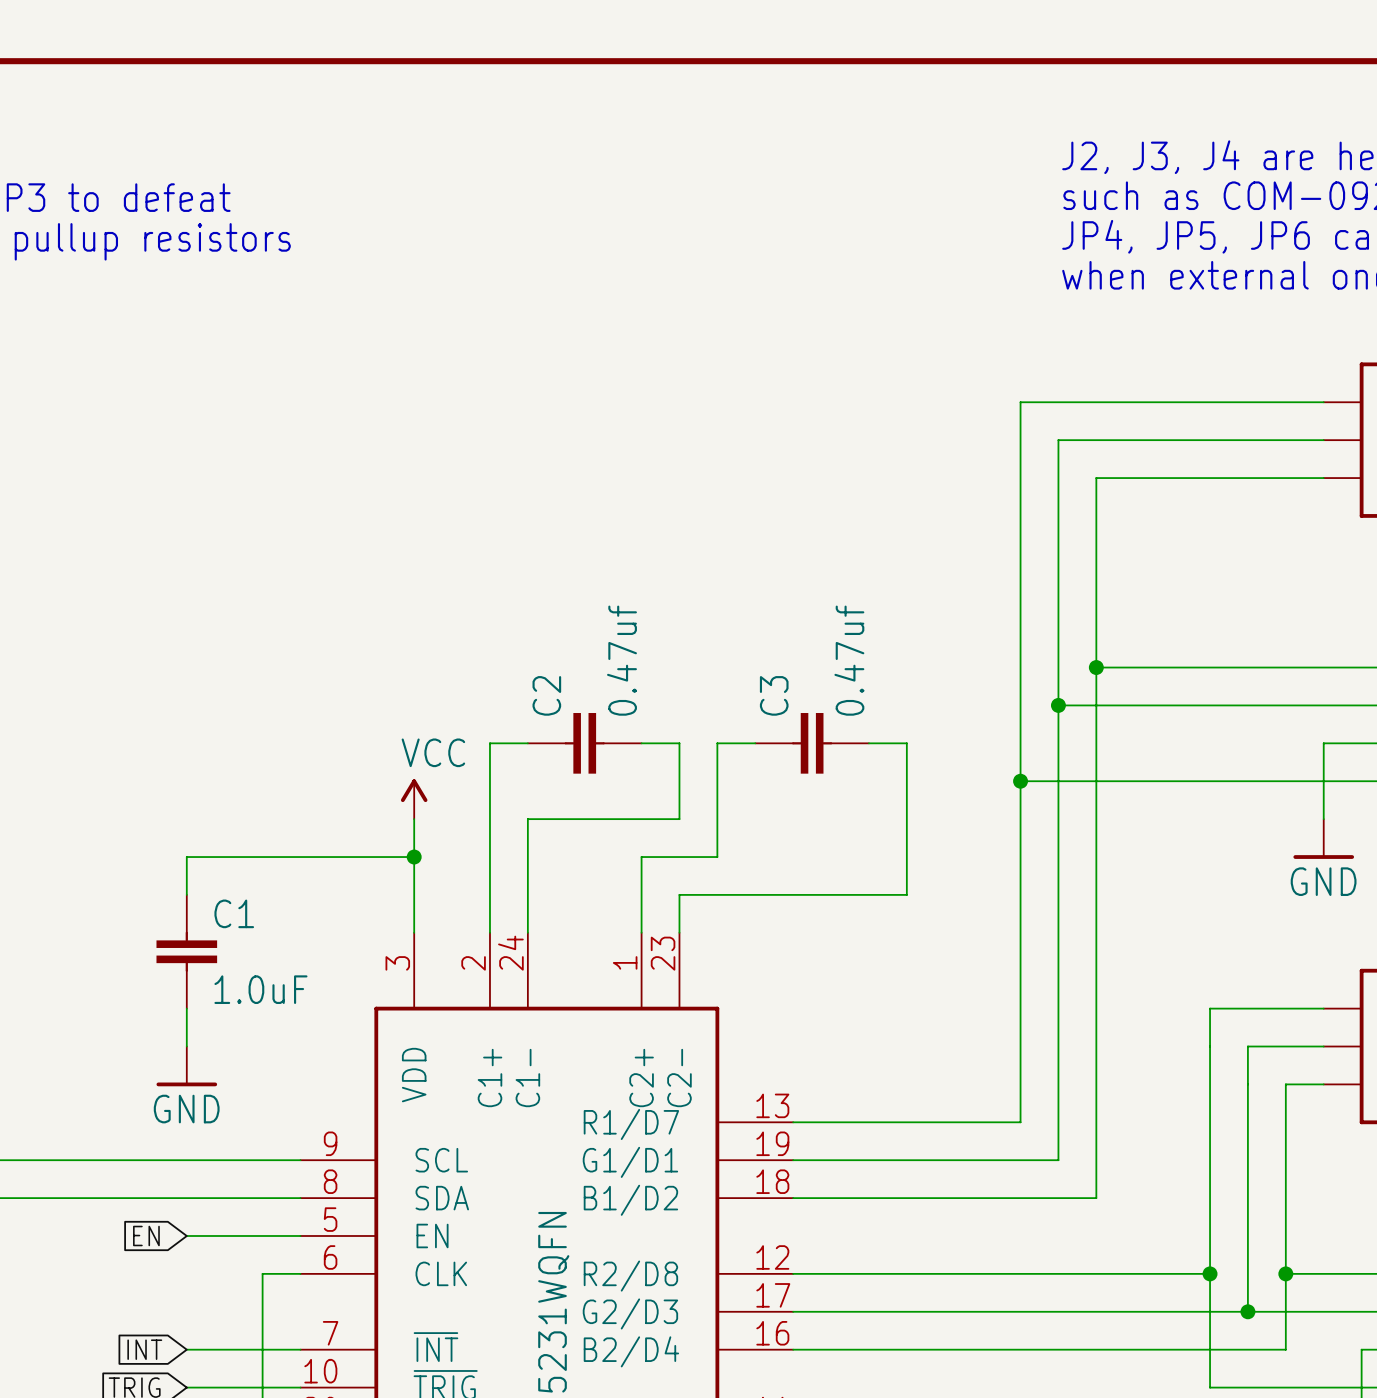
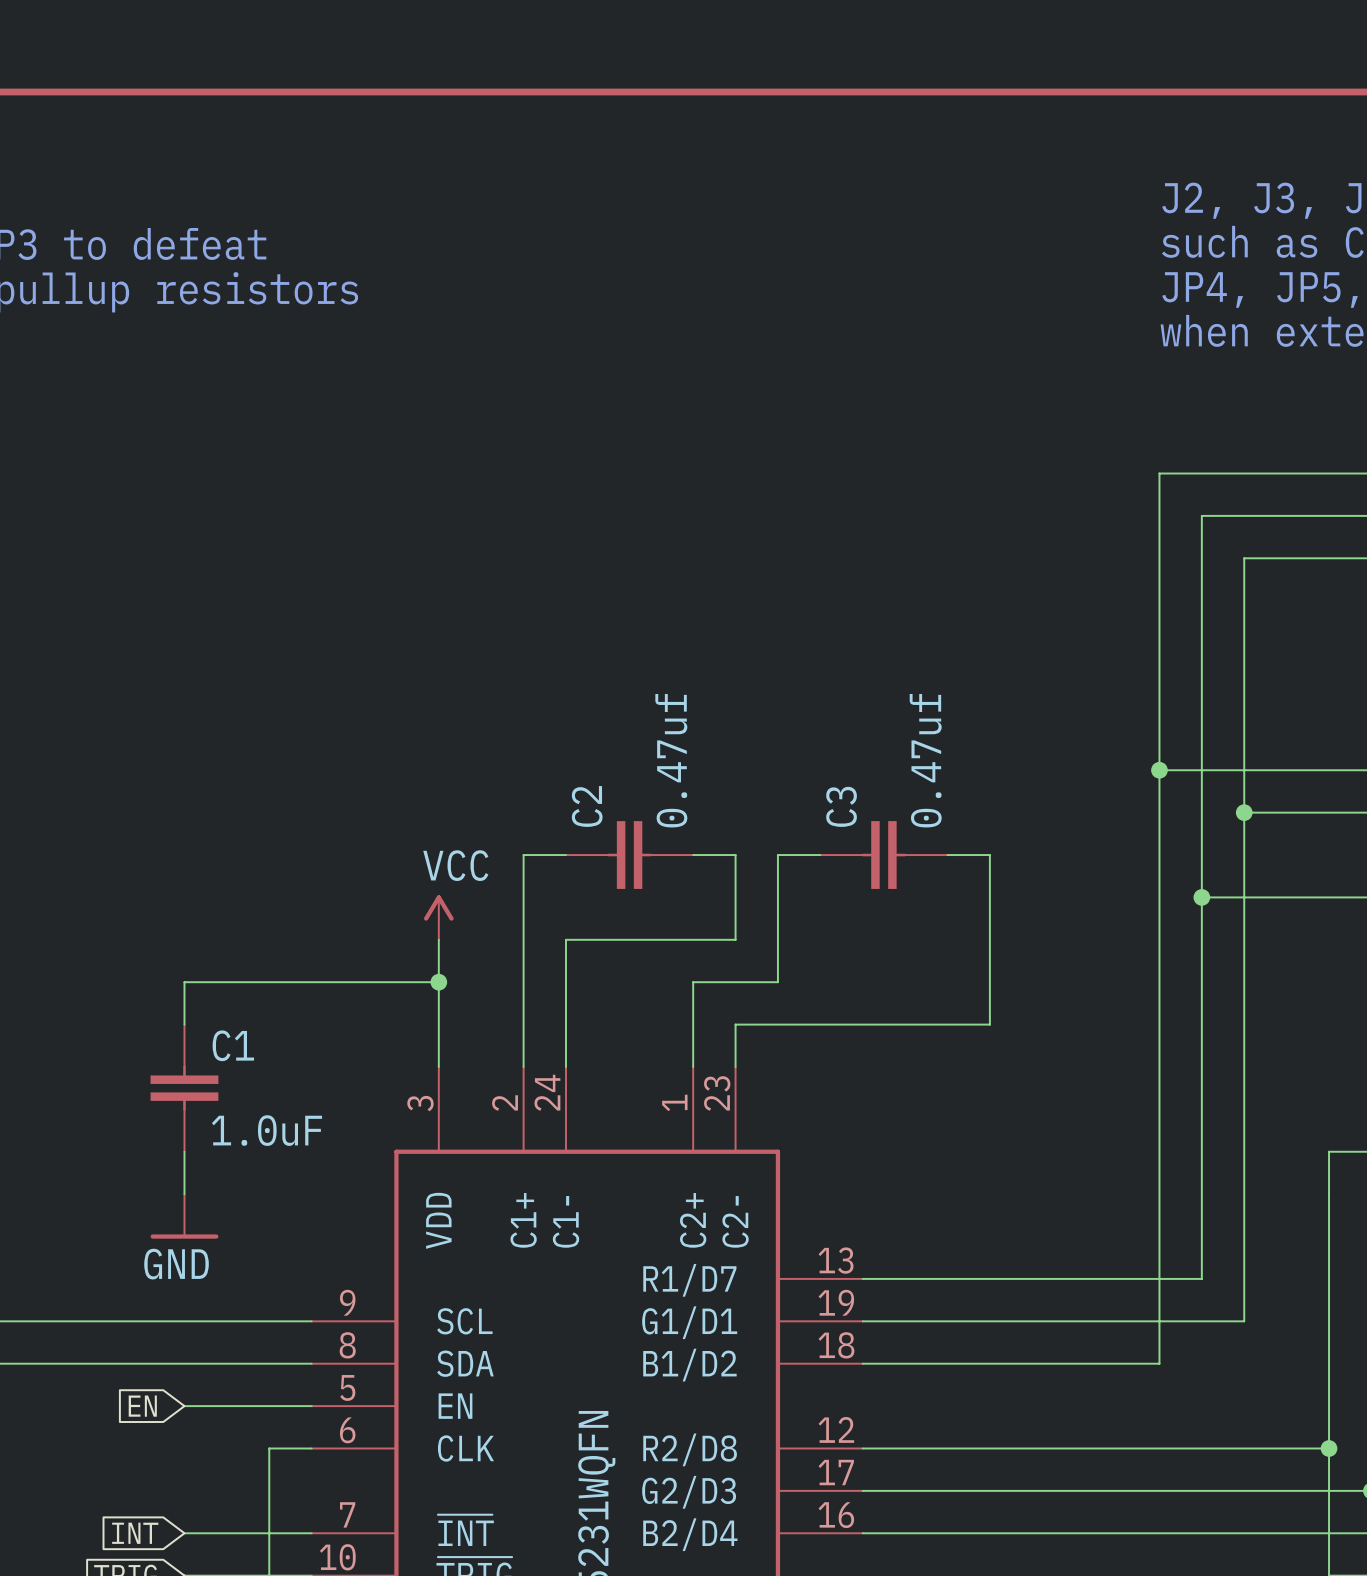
wire: (1058, 402) (1020, 402) (1020, 1122) -> none
wire: (1058, 440) (1096, 440) -> (1159, 515) (1159, 473)
wire: (1096, 478) (1134, 478) -> (1201, 558) (1201, 515)
wire: none -> (1244, 558) (1244, 1321) (1159, 1321) (1159, 1363)
wire: none -> (1159, 770) (1201, 770)
junction: none -> (1159, 770)
junction: (1096, 667) -> none
wire: (1058, 705) (1134, 705) -> none
junction: (1058, 705) -> none
junction: none -> (1244, 812)
wire: (1020, 781) (1096, 781) -> none
junction: (1020, 781) -> none
junction: none -> (1201, 897)
wire: (1096, 1122) (1096, 1198) (1058, 1198) -> (1201, 1278) (1117, 1278)

